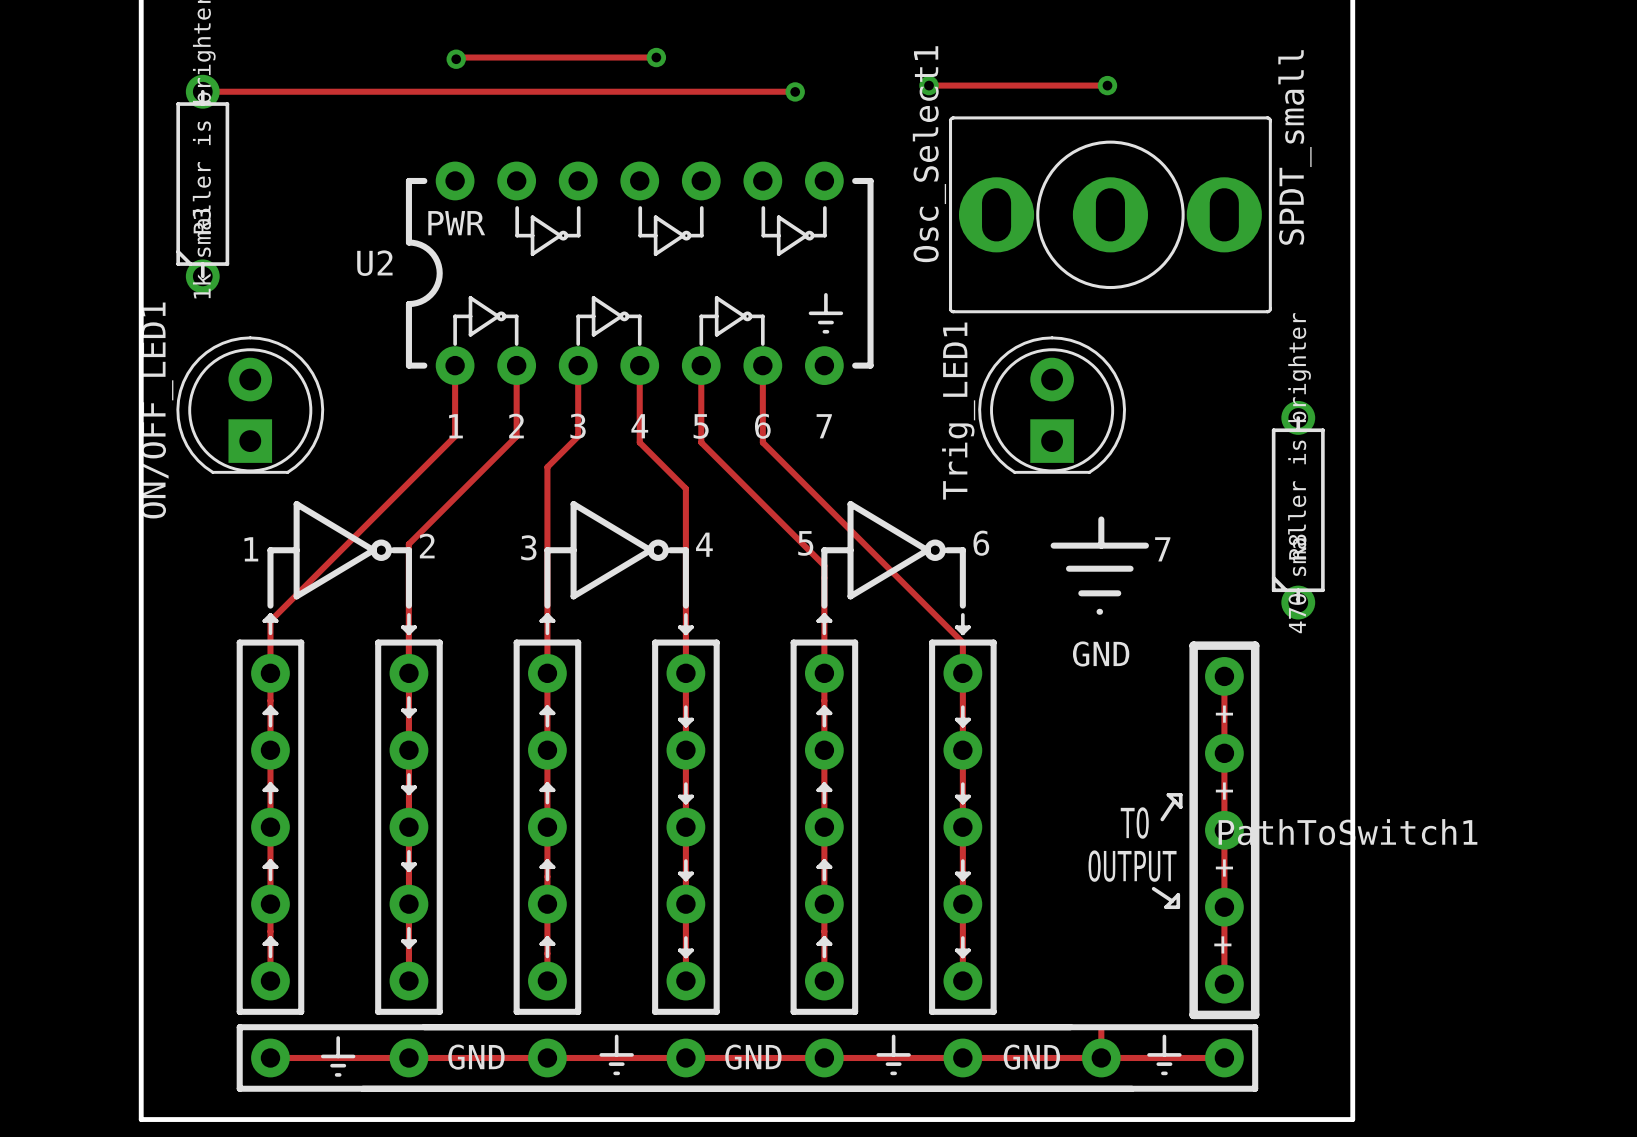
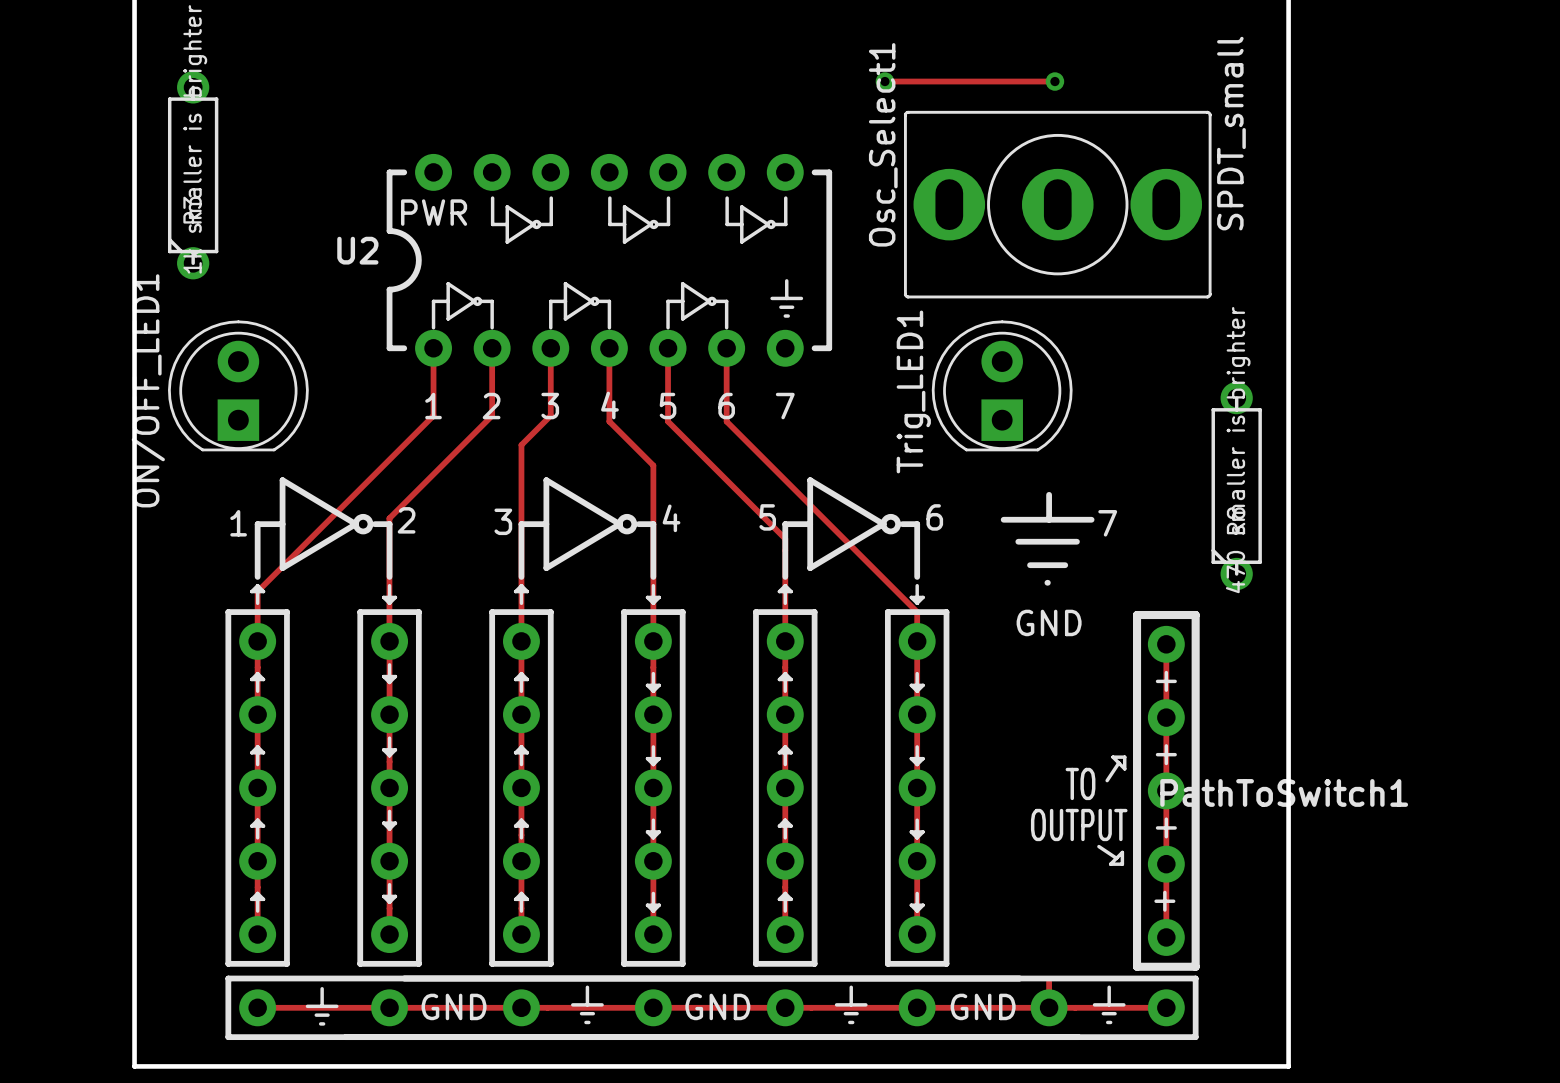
track: (656, 57) (457, 57) (456, 59) -> none
via: (656, 57) -> none
via: (456, 59) -> none
track: (202, 91) (795, 91) -> none
via: (795, 91) -> none

